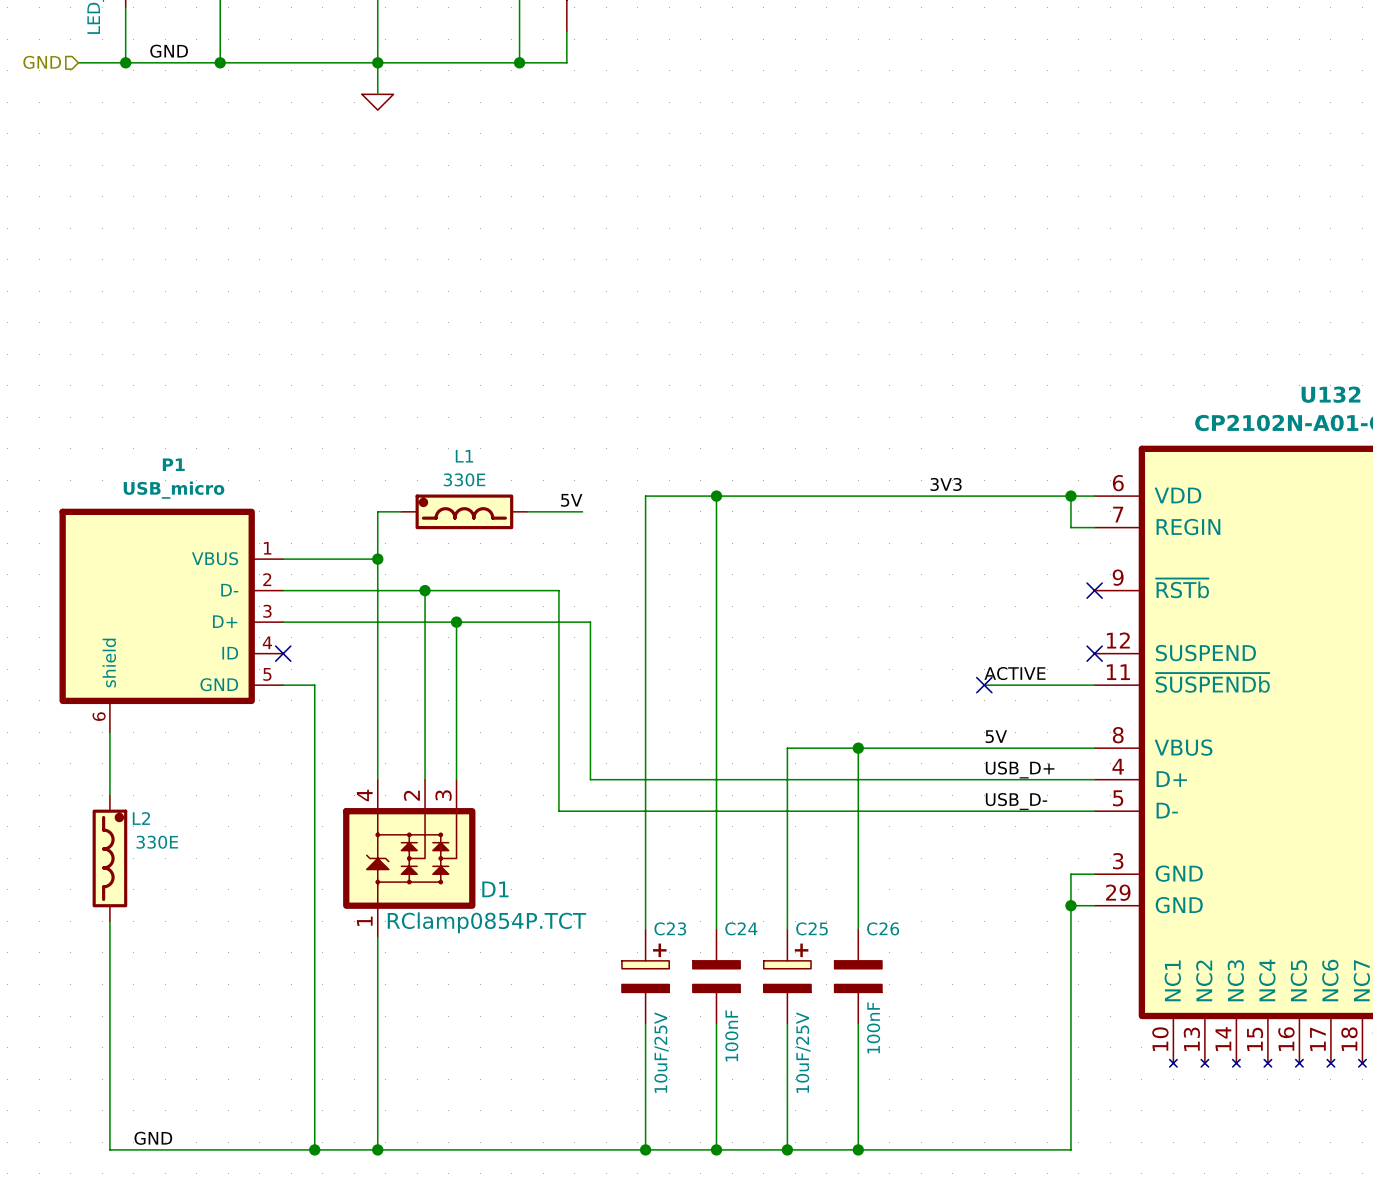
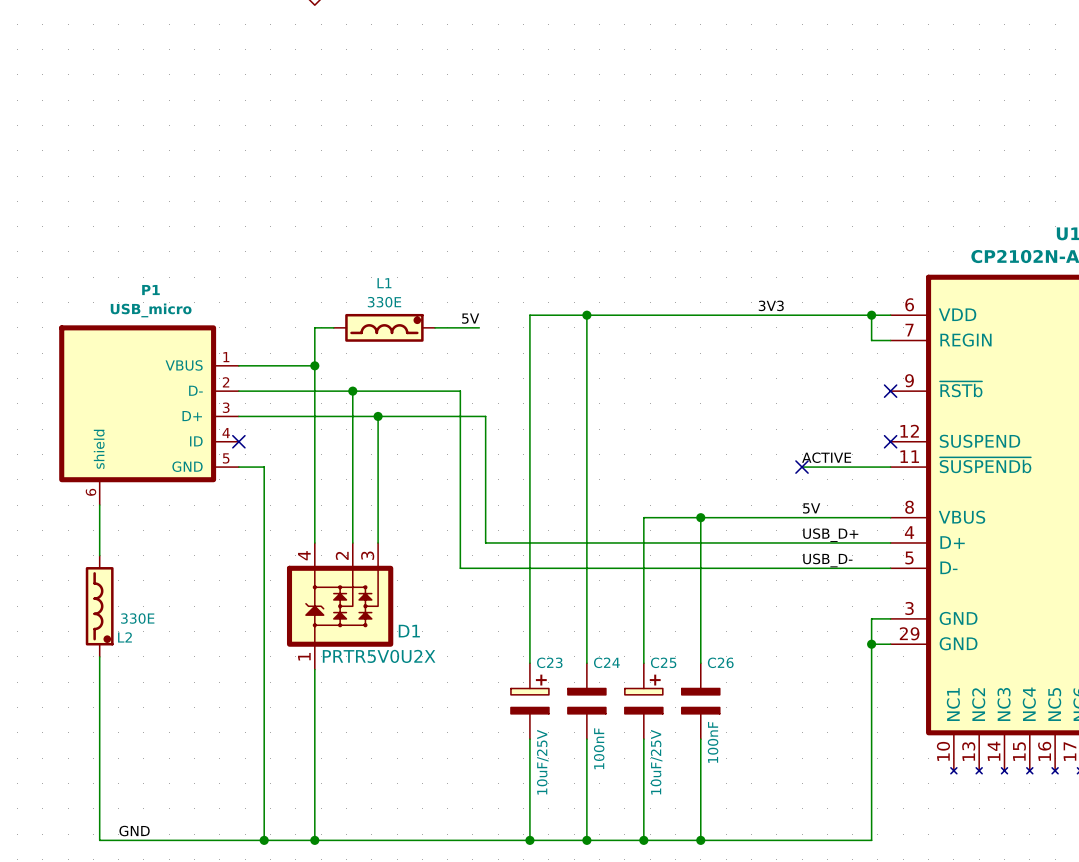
L1 flip: as is (464, 511) -> left-right (384, 327)
L2 flip: as is (109, 858) -> up-down (99, 606)
D1 value: RClamp0854P.TCT (486, 922) -> PRTR5V0U2X (379, 656)

